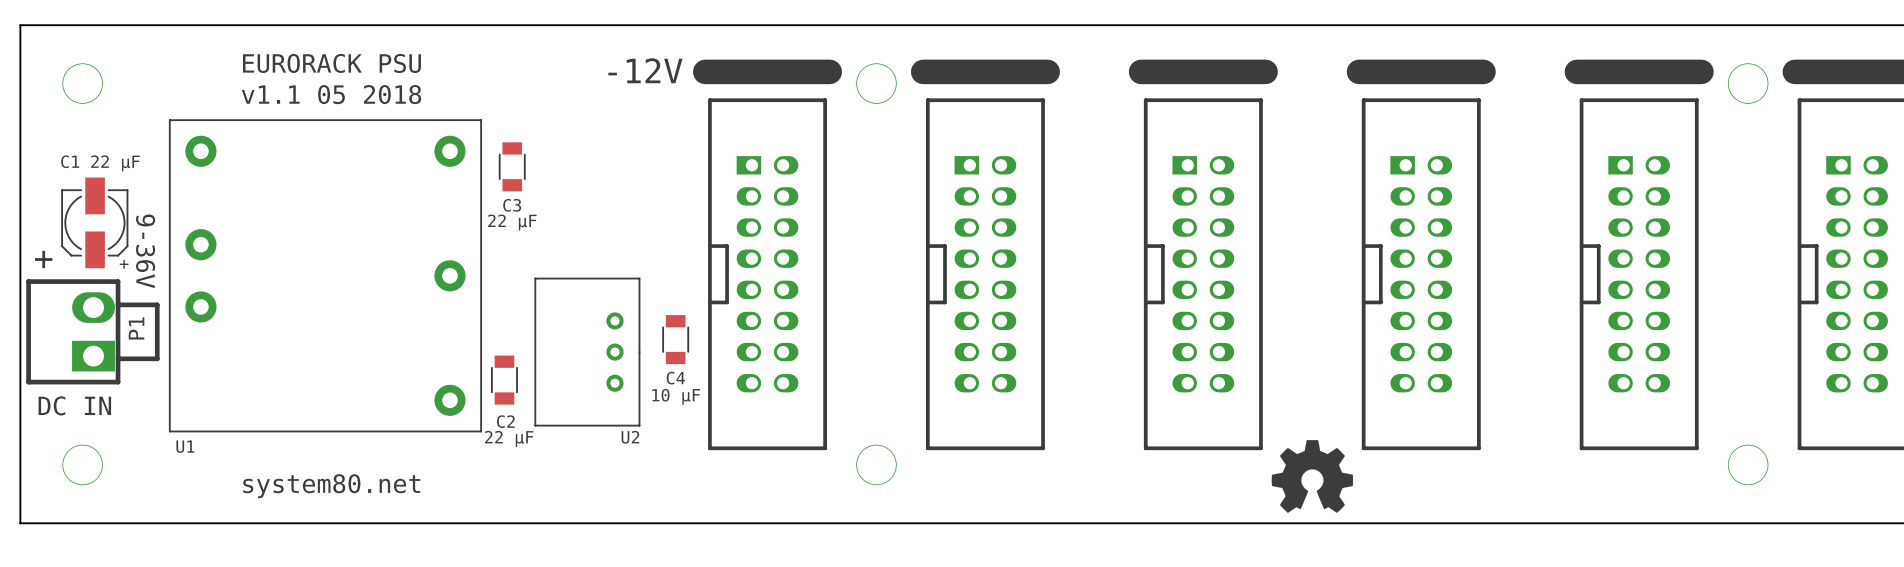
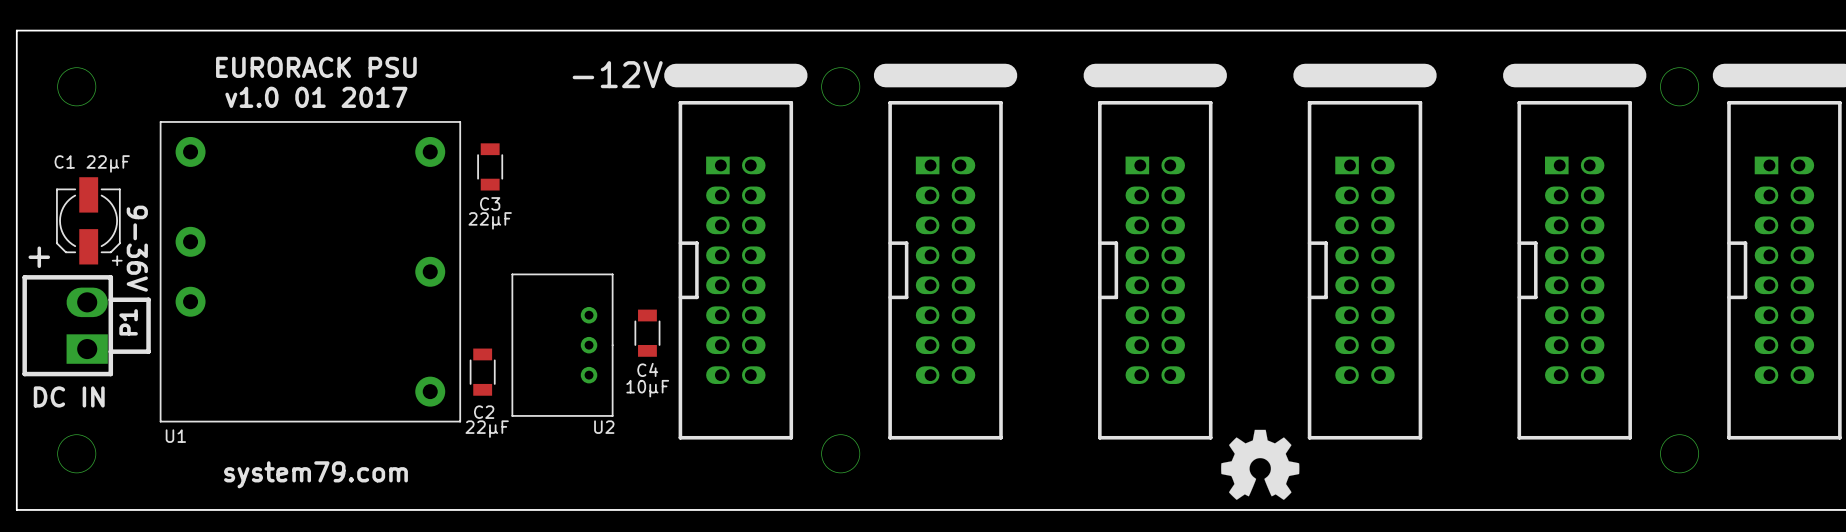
text: v1.1 05 2018 (331, 94) -> v1.0 01 2017 (316, 97)
C1 value: 22 μF (115, 163) -> 22μF (108, 163)
C3 value: 22 μF (512, 222) -> 22μF (490, 220)
C4 value: 10 μF (676, 396) -> 10μF (647, 388)
C2 value: 22 μF (509, 438) -> 22μF (487, 429)
text: system80.net (331, 486) -> system79.com (315, 474)

